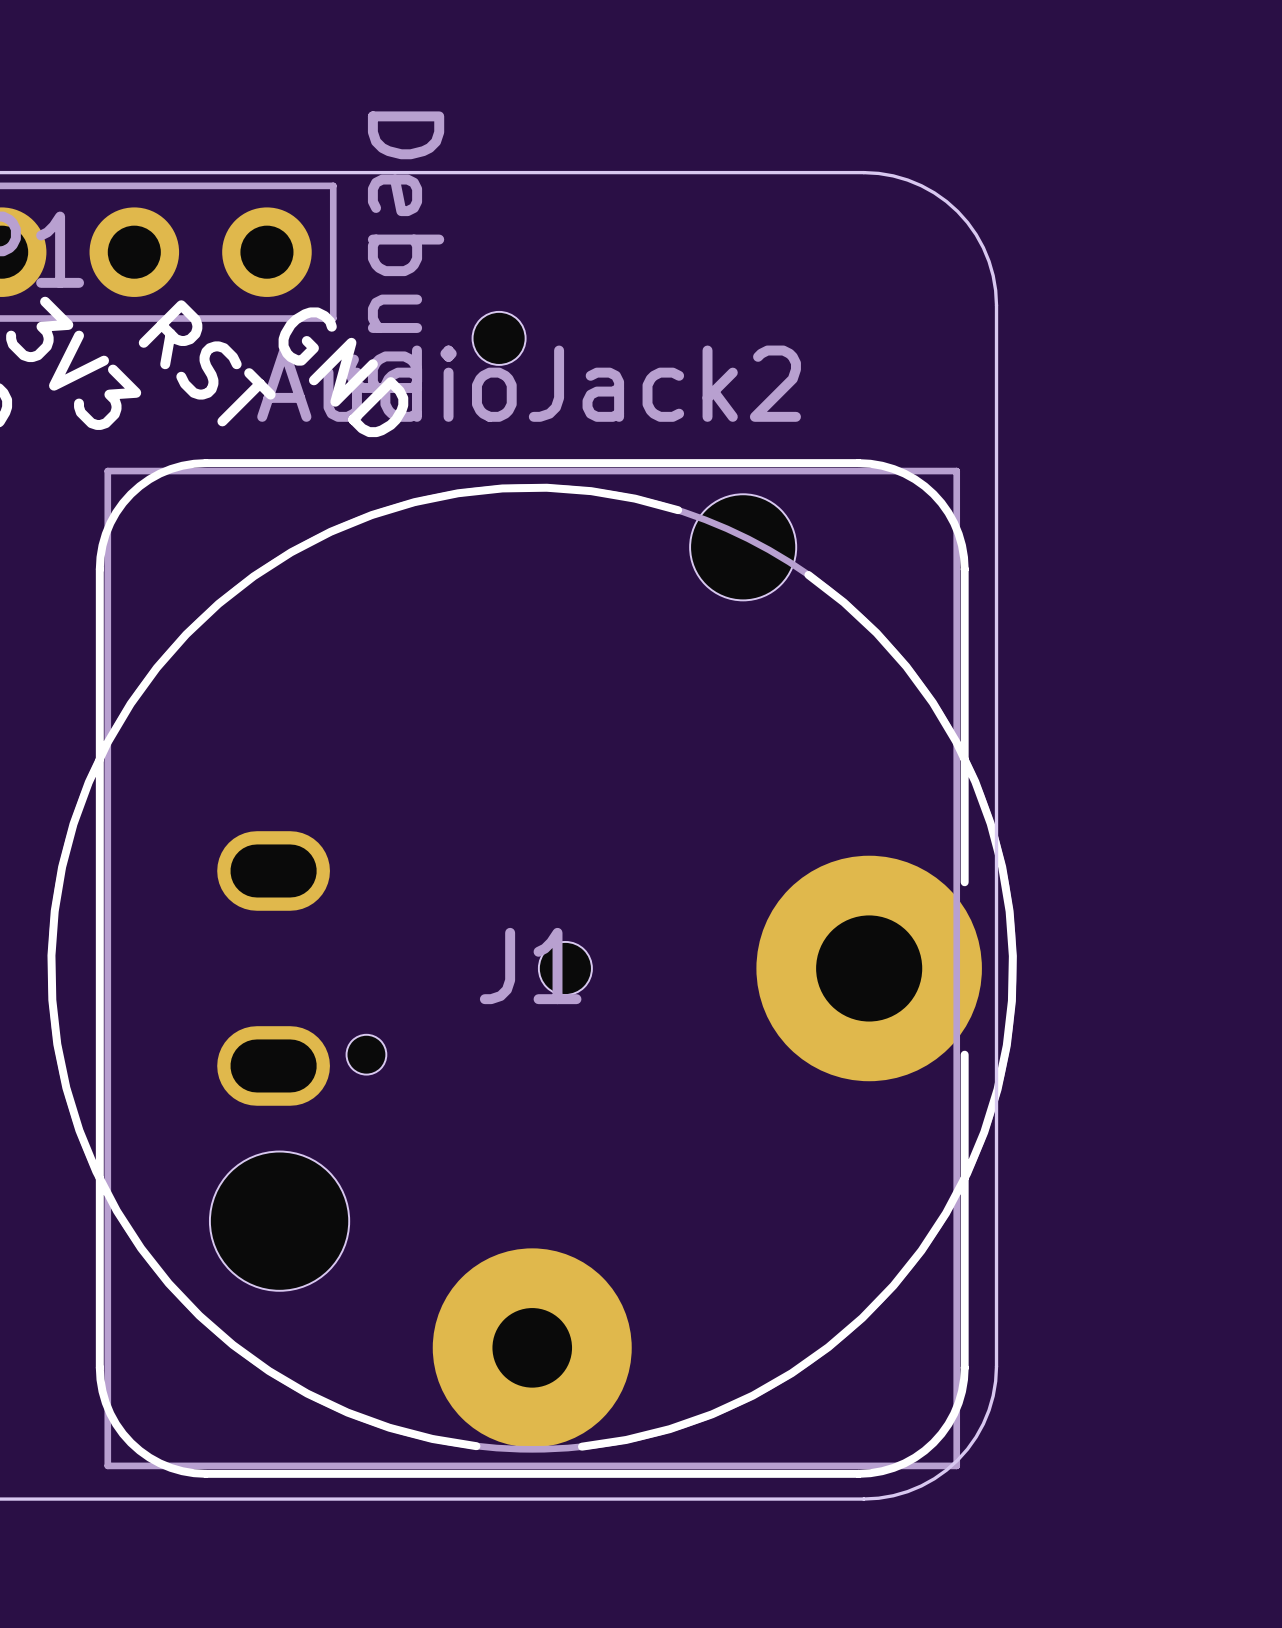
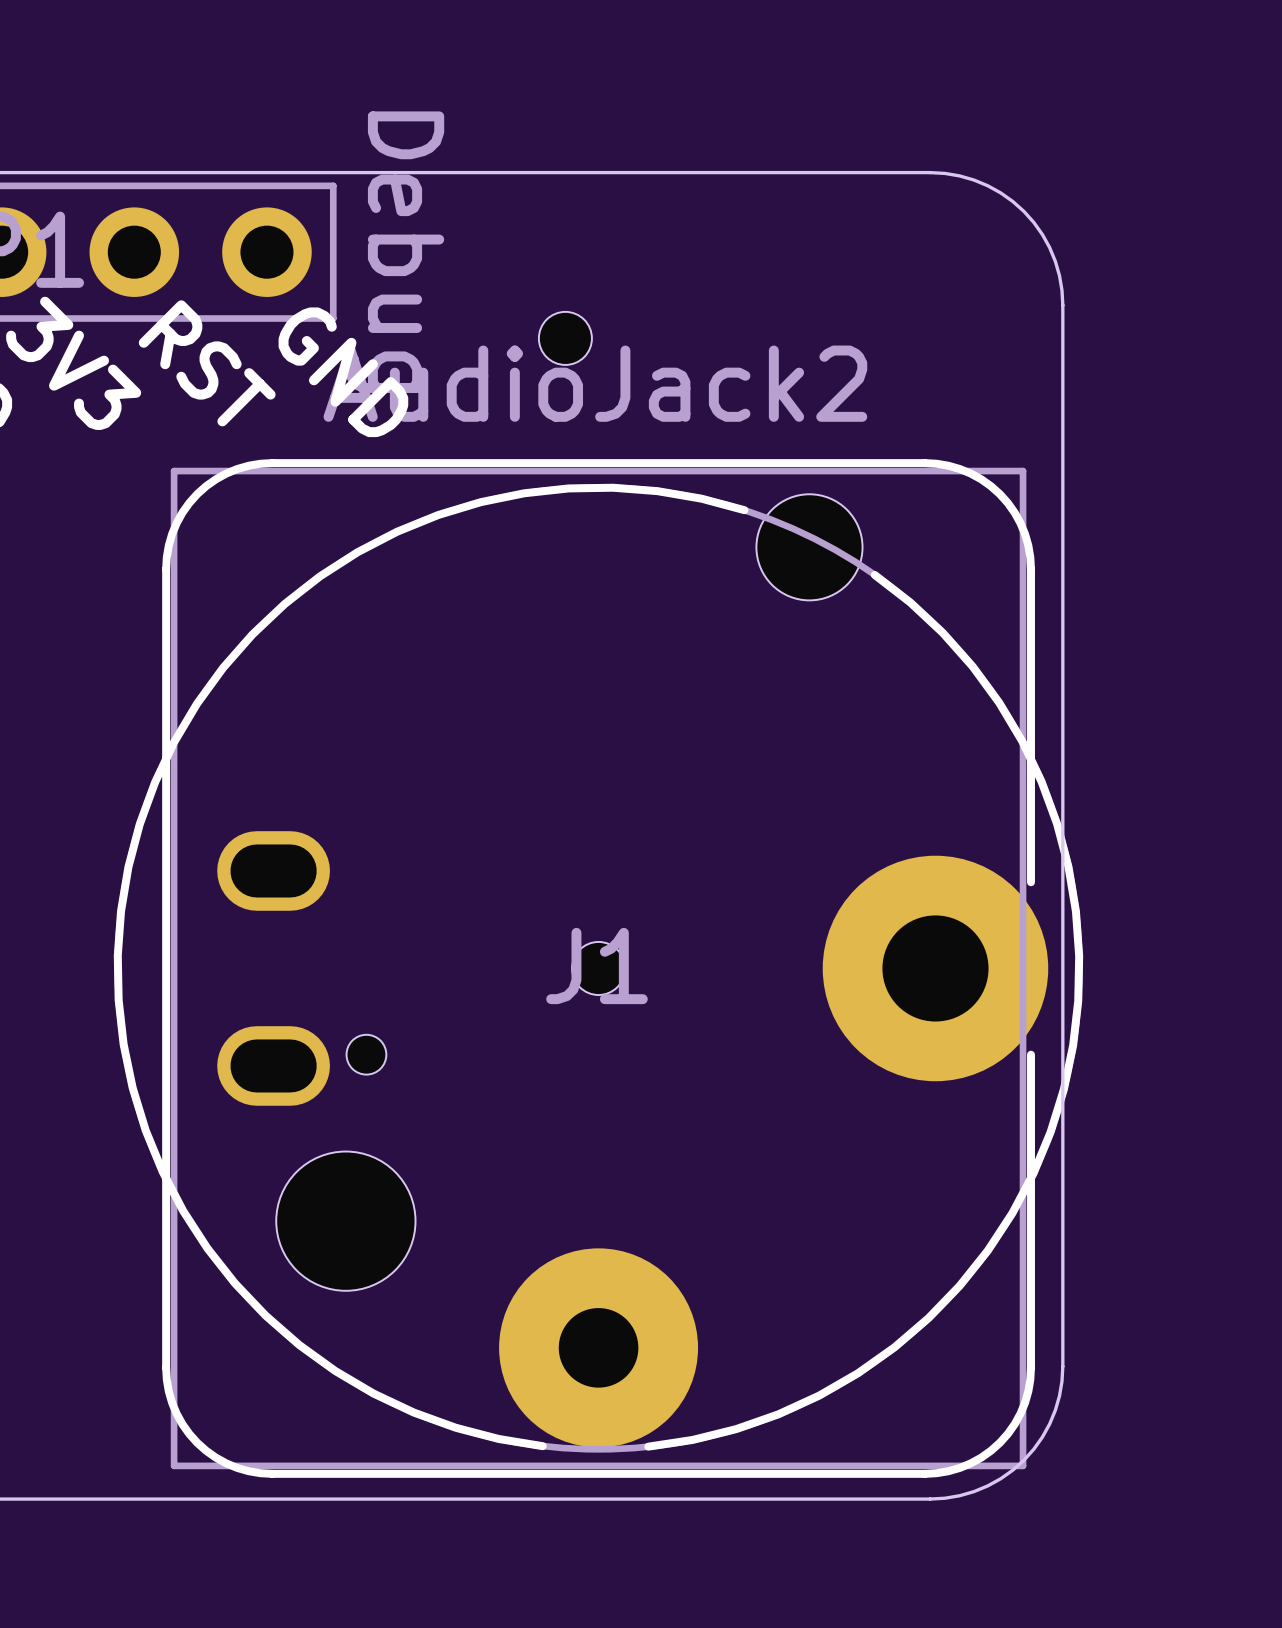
board edge: (863, 172) (878, 173) (907, 180) (934, 192) (957, 211) (976, 234) (983, 247) (993, 275) (996, 305) (995, 1381) (989, 1410) (976, 1436) (957, 1460) (946, 1470) (921, 1485) (907, 1491) (893, 1495) (863, 1499) -> (863, 172) (945, 173) (973, 180) (1000, 192) (1023, 211) (1042, 234) (1049, 247) (1059, 275) (1062, 305) (1061, 1381) (1055, 1410) (1042, 1436) (1023, 1460) (1000, 1478) (973, 1491) (945, 1498) (863, 1499)
part position: (499, 338) -> (565, 338)
J1 position: (532, 968) -> (598, 968)
part position: (565, 968) -> (598, 968)

